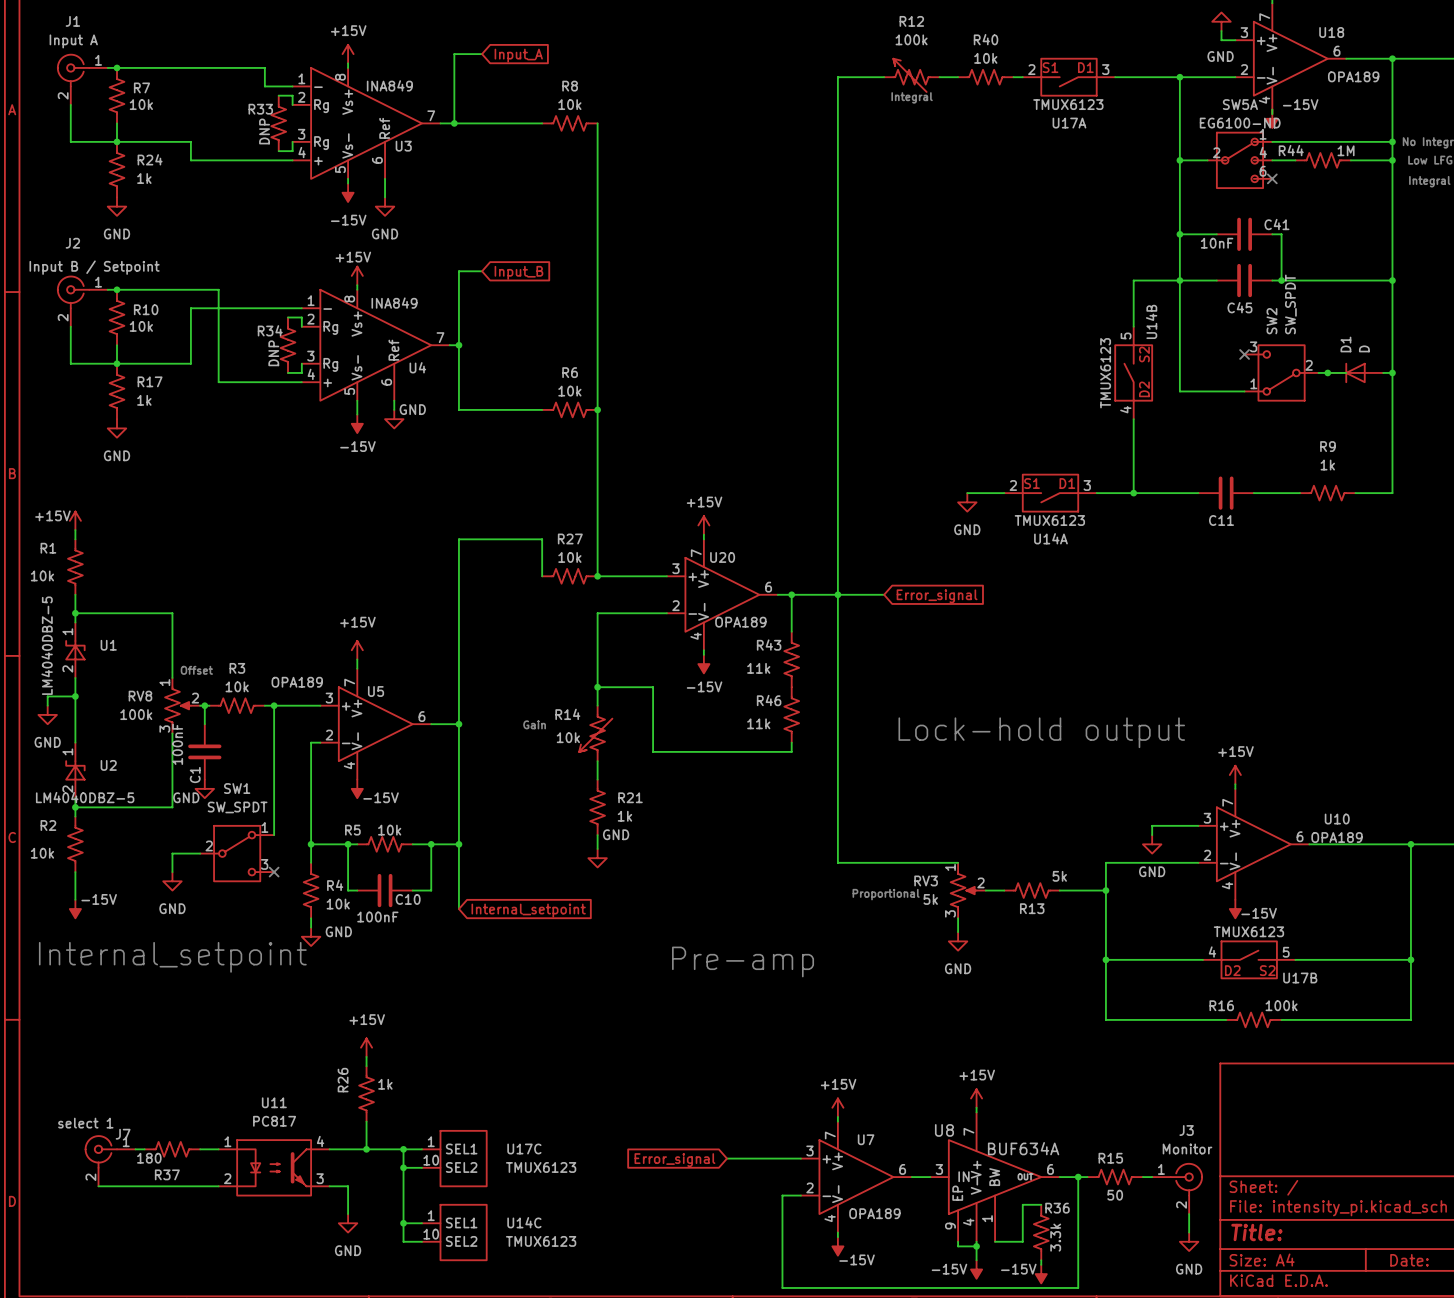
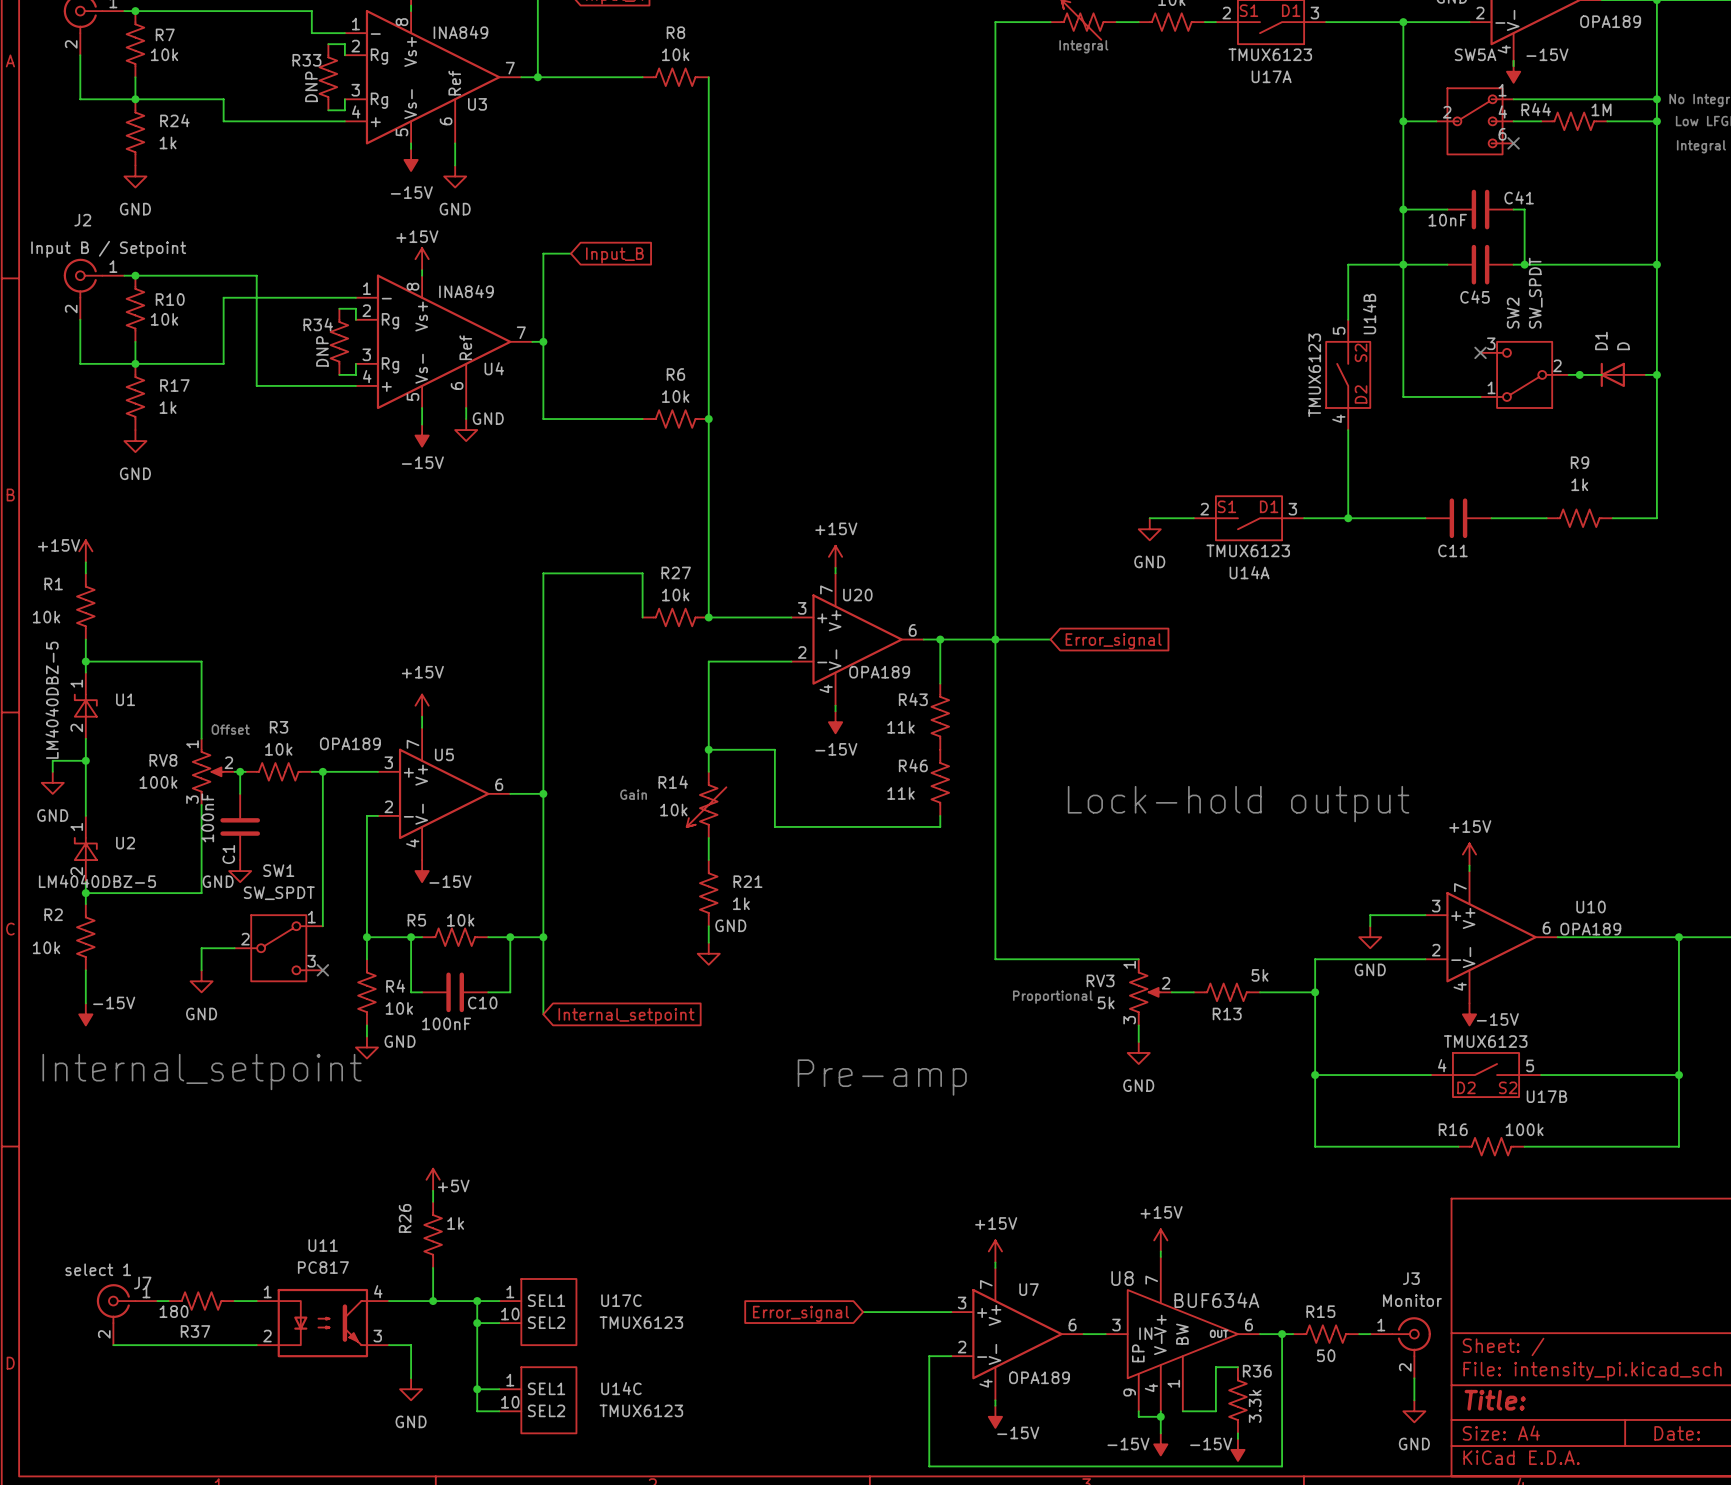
SW5A value: EG6100-ND (1240, 123) -> none
power symbol: +15V (366, 1047) -> +5V (433, 1179)

